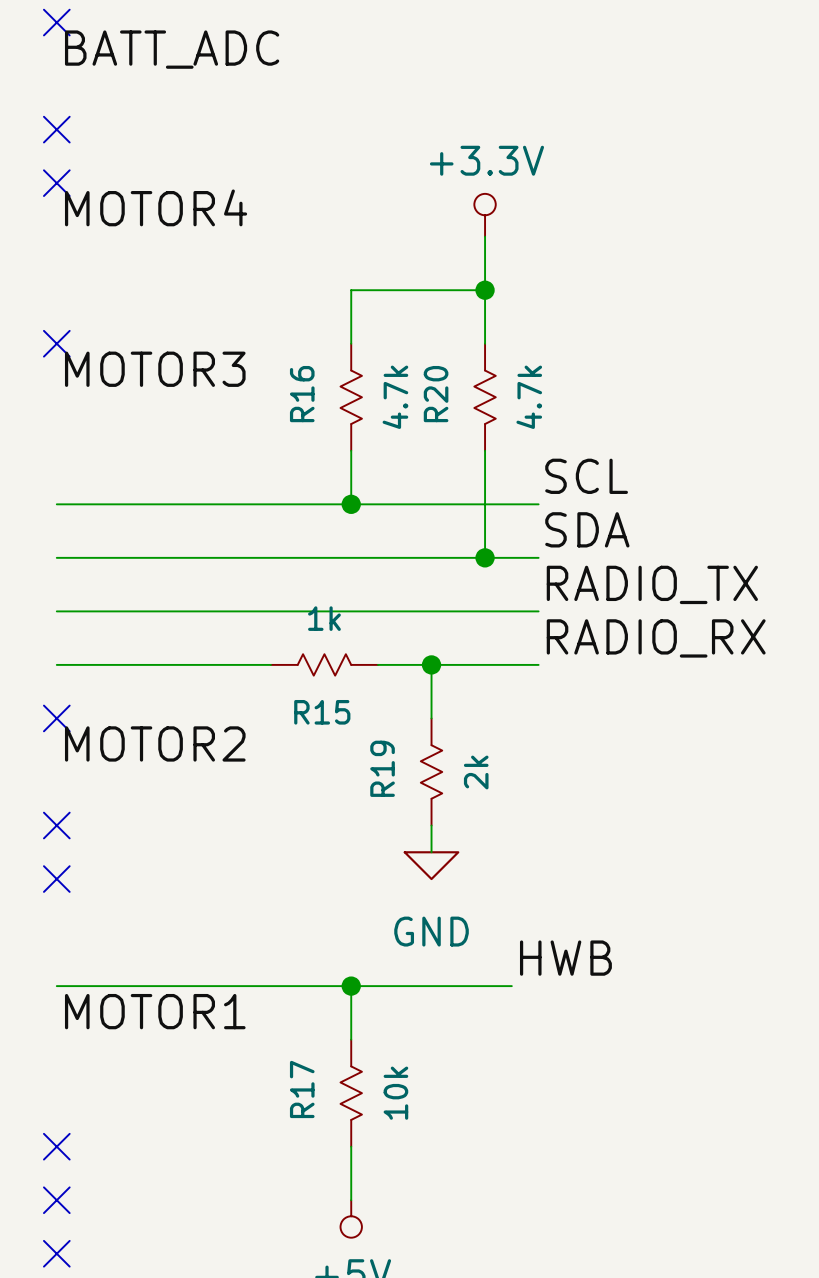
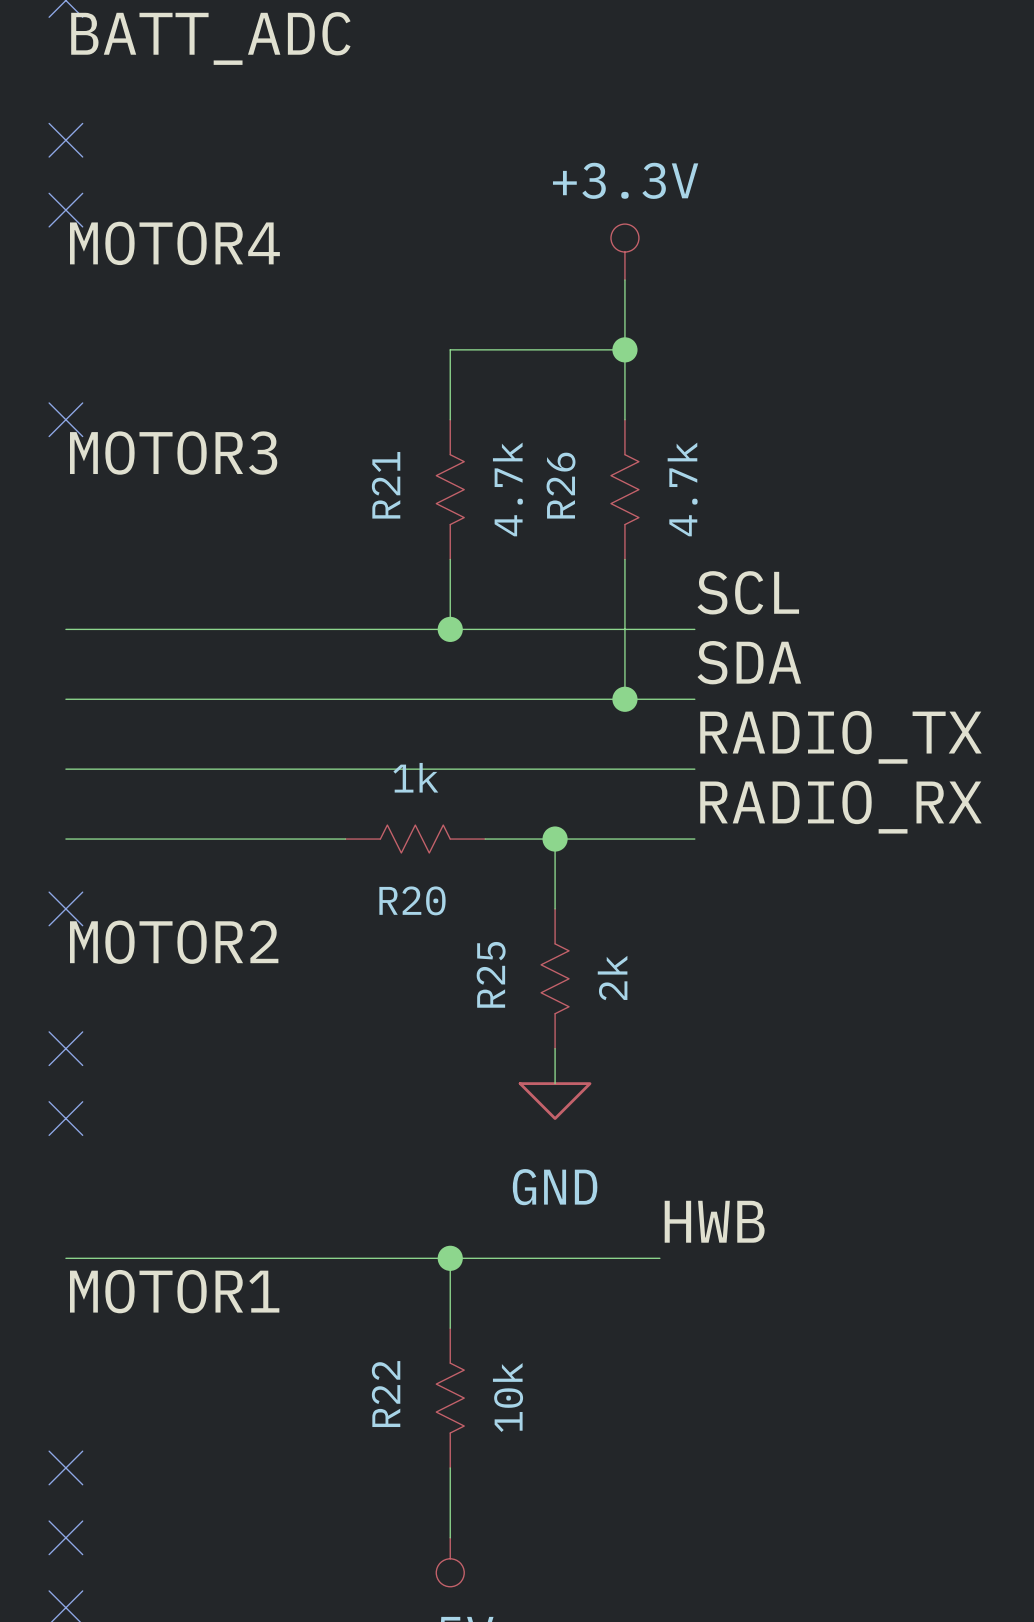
R16 name: R16 (302, 394) -> R21 (386, 485)
R20 name: R20 (436, 394) -> R26 (561, 485)
R15 name: R15 (322, 712) -> R20 (412, 900)
R19 name: R19 (382, 768) -> R25 (491, 974)
R17 name: R17 (302, 1089) -> R22 (386, 1394)

